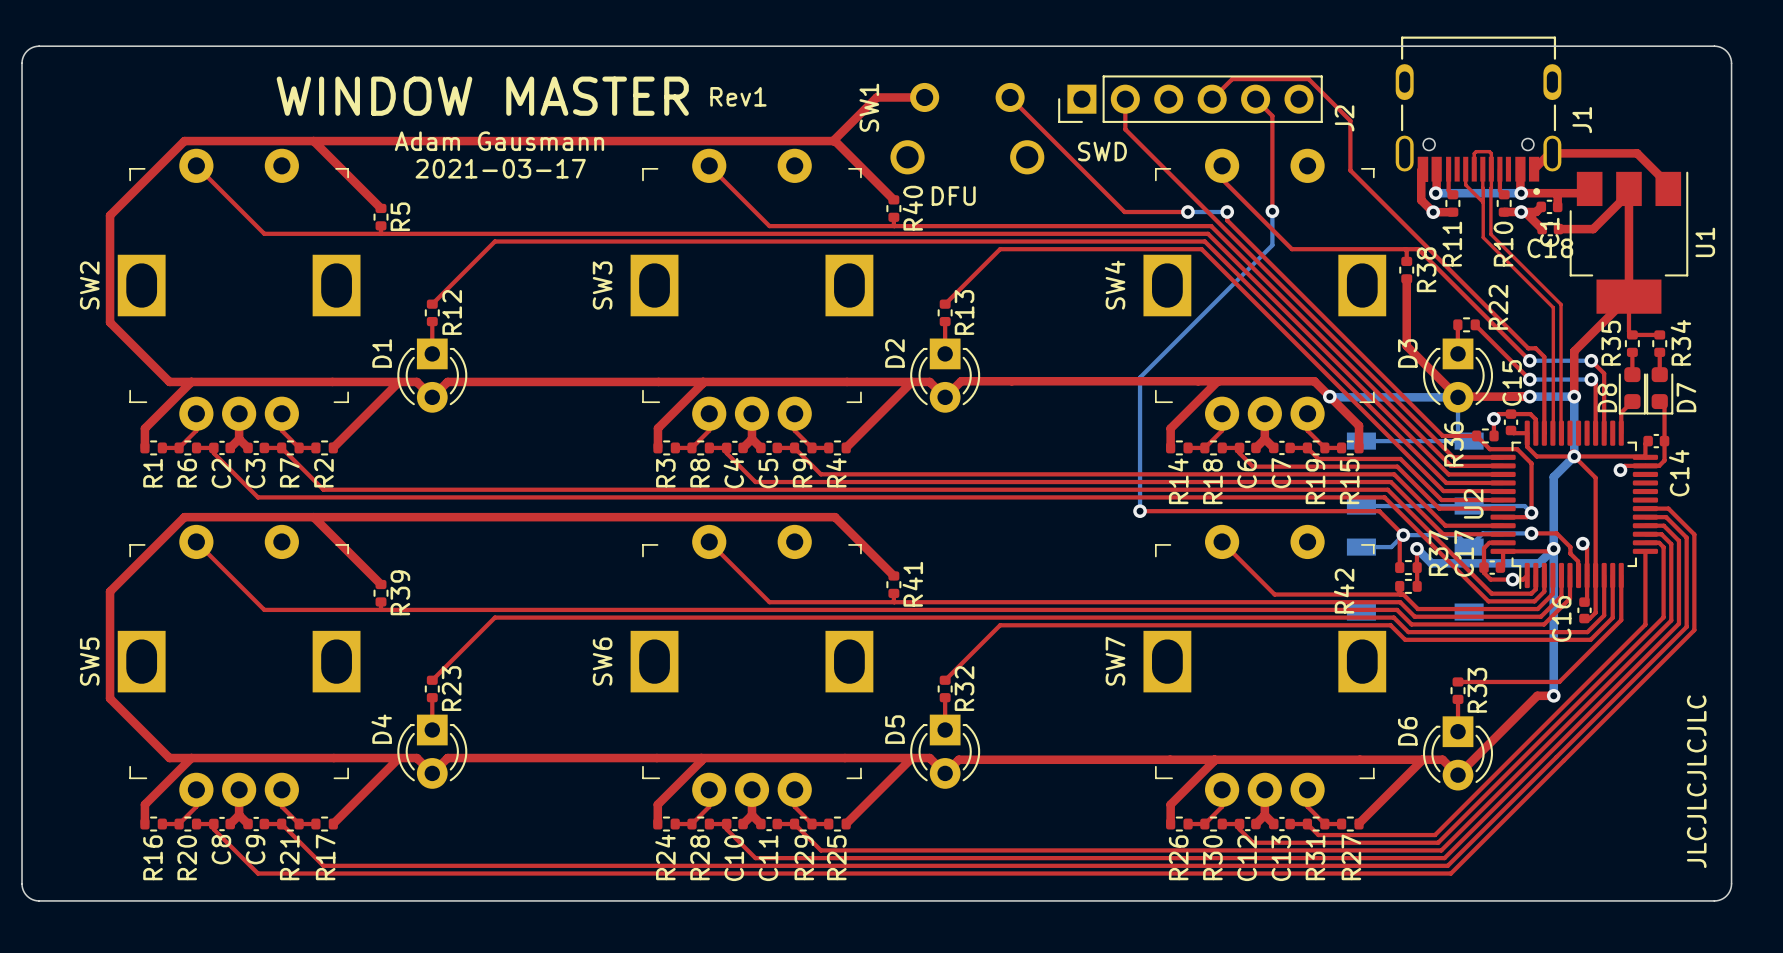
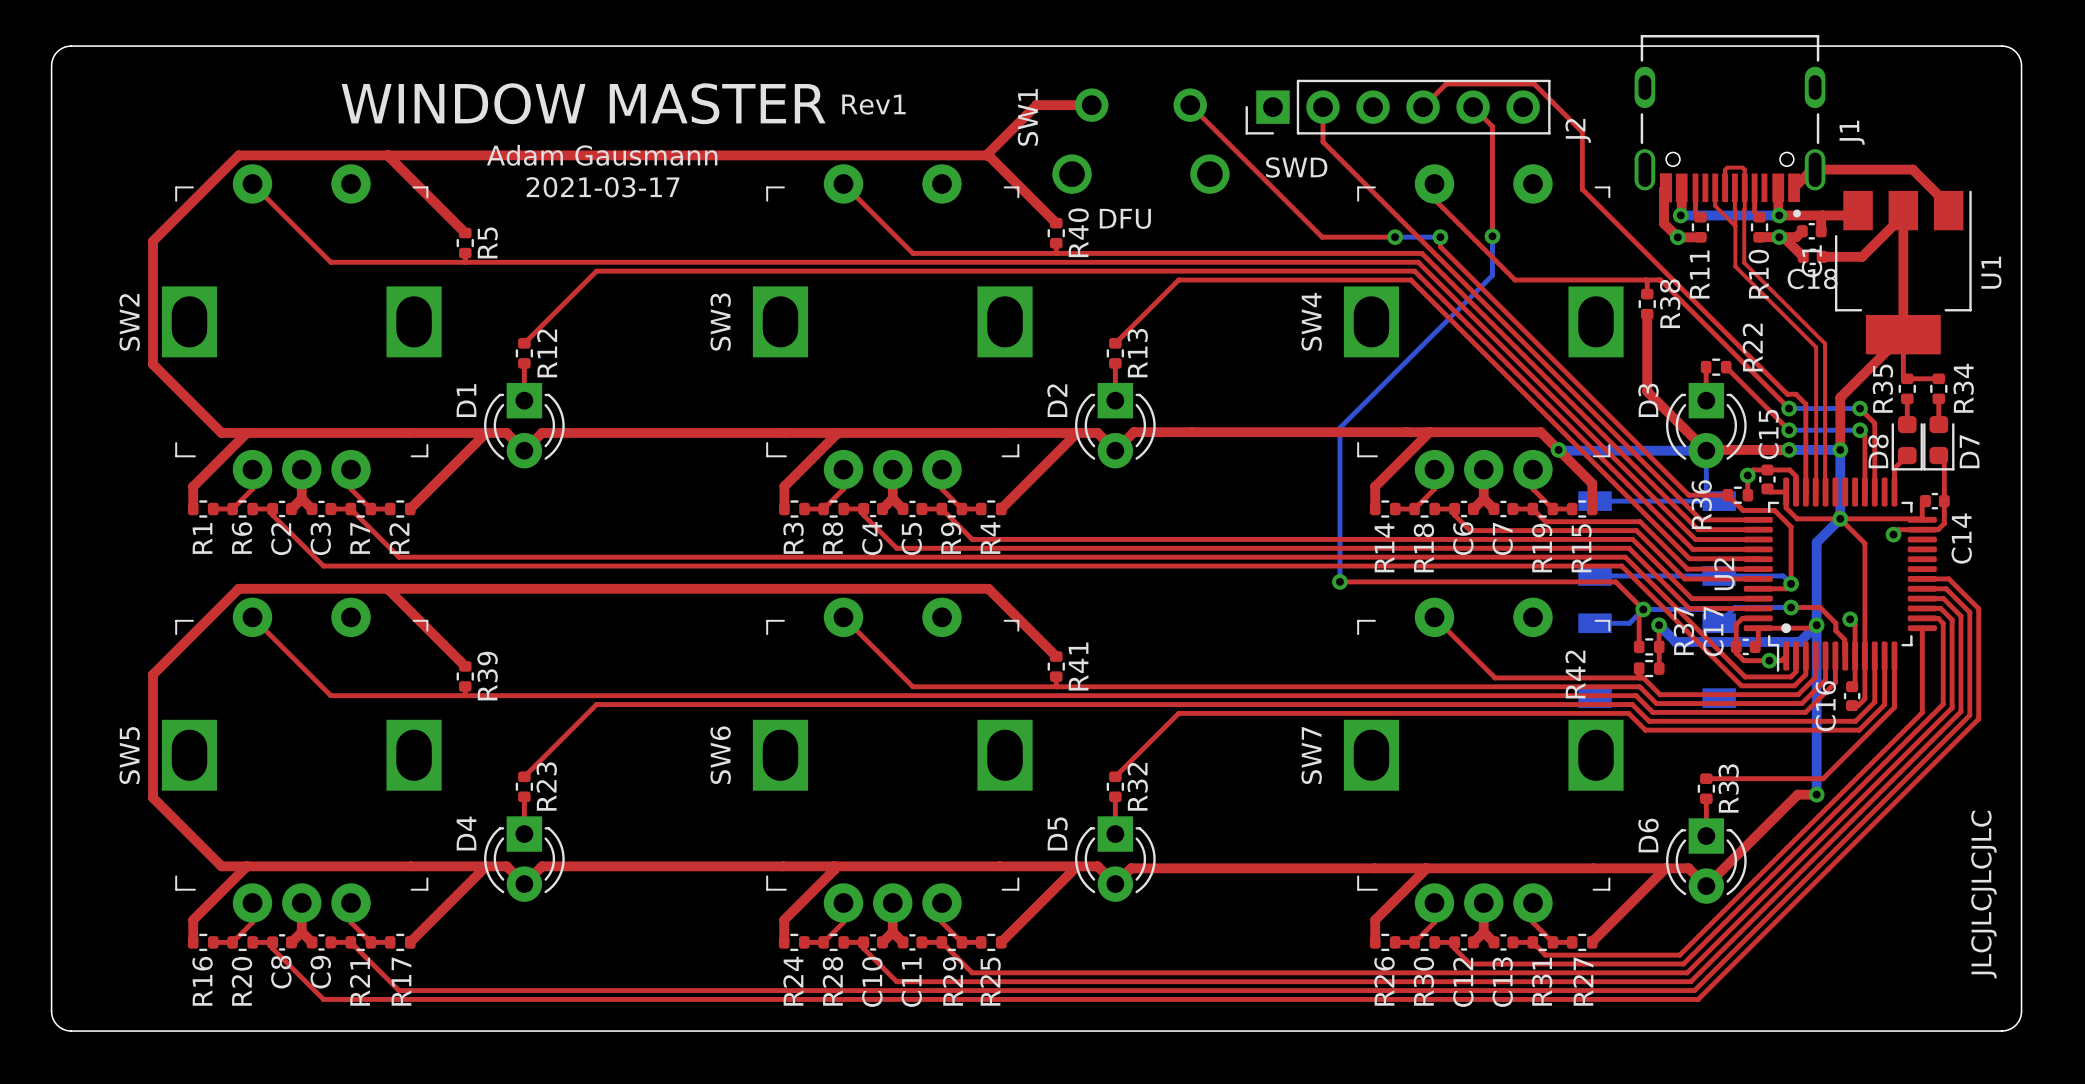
U2 footprint: [1490, 420, 1659, 590] -> [1743, 477, 1937, 672]

